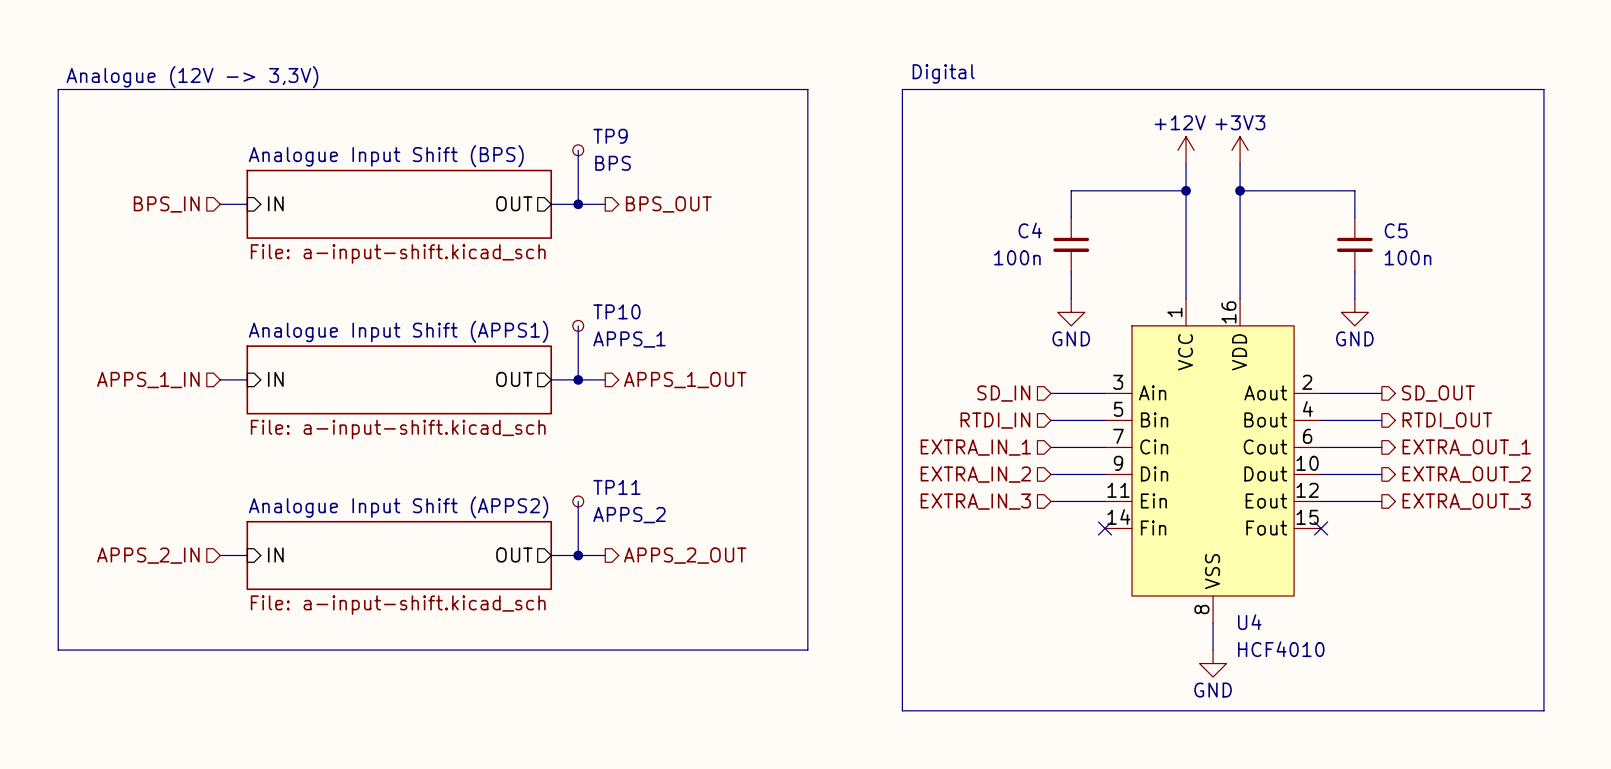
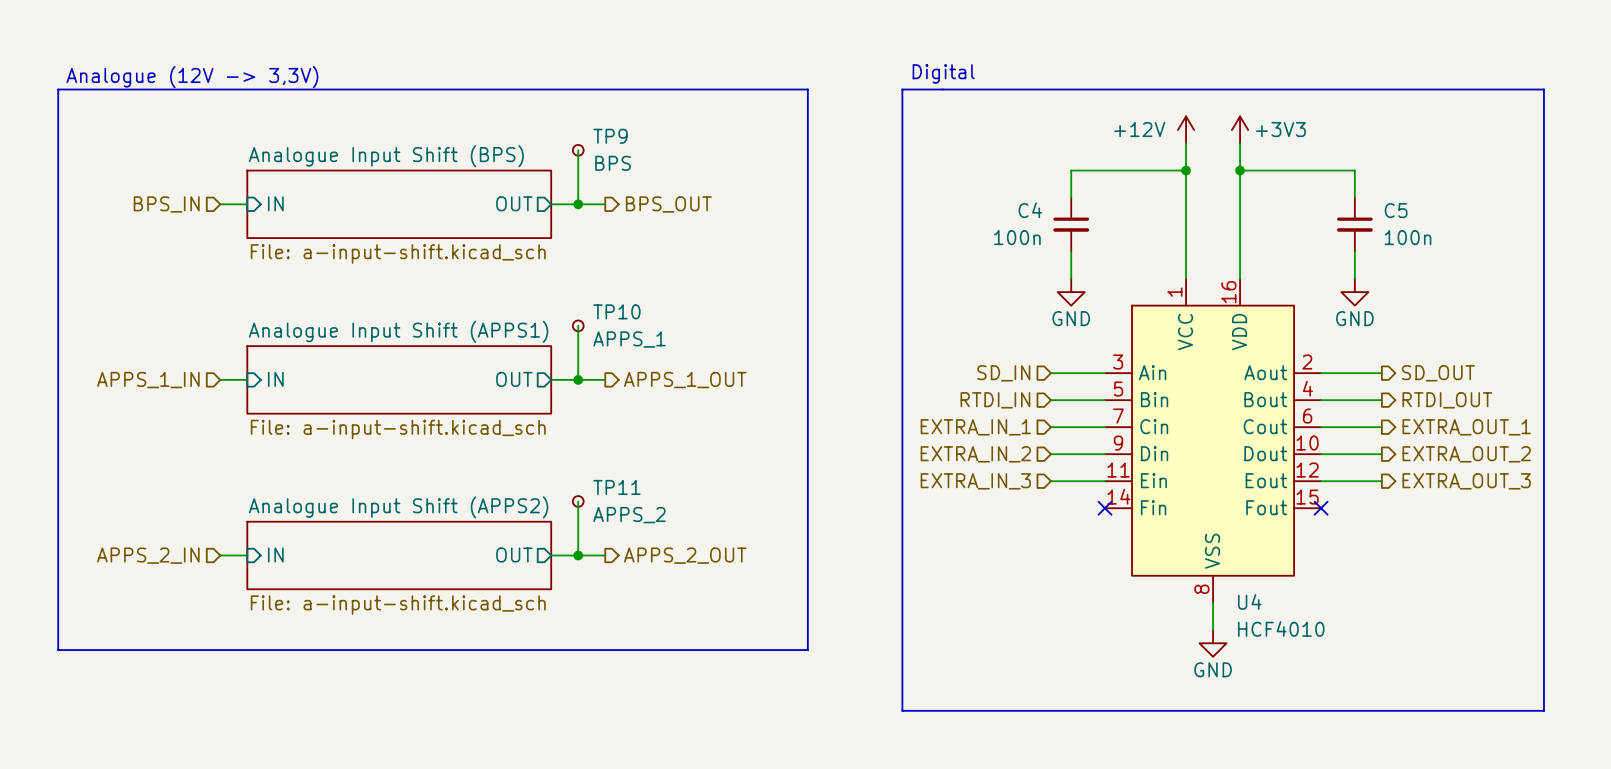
power symbol text position: +12V (1180, 122) -> +12V (1139, 129)
power symbol text position: +3V3 (1240, 122) -> +3V3 (1280, 129)
power symbol position: +12V (1186, 150) -> +12V (1186, 130)
power symbol position: +3V3 (1240, 150) -> +3V3 (1240, 130)
wire: (1071, 190) (1186, 190) -> (1071, 190) (1071, 170) (1186, 170)
junction position: (1186, 190) -> (1186, 170)
wire: (1240, 190) (1354, 190) -> (1240, 170) (1354, 170) (1354, 190)
junction position: (1240, 190) -> (1240, 170)
C4 position: (1071, 244) -> (1071, 224)
C5 position: (1354, 244) -> (1354, 224)
power symbol position: GND (1071, 312) -> GND (1071, 292)
power symbol position: GND (1354, 312) -> GND (1354, 292)
hierarchical label position: SD_IN (1003, 393) -> SD_IN (1003, 373)
wire: (1050, 393) (1104, 393) -> (1050, 373) (1104, 373)
wire: (1321, 393) (1381, 393) -> (1321, 373) (1381, 373)
hierarchical label position: SD_OUT (1438, 393) -> SD_OUT (1438, 373)
hierarchical label position: RTDI_IN (995, 420) -> RTDI_IN (995, 400)
wire: (1050, 420) (1104, 420) -> (1050, 400) (1104, 400)
wire: (1321, 420) (1381, 420) -> (1321, 400) (1381, 400)
hierarchical label position: RTDI_OUT (1447, 420) -> RTDI_OUT (1447, 400)
hierarchical label position: EXTRA_IN_1 (975, 447) -> EXTRA_IN_1 (975, 427)
wire: (1050, 447) (1104, 447) -> (1050, 427) (1104, 427)
wire: (1321, 447) (1381, 447) -> (1321, 427) (1381, 427)
hierarchical label position: EXTRA_OUT_1 (1466, 447) -> EXTRA_OUT_1 (1466, 427)
U4 position: (1213, 460) -> (1213, 440)
hierarchical label position: EXTRA_IN_2 (975, 474) -> EXTRA_IN_2 (975, 454)
wire: (1050, 474) (1104, 474) -> (1050, 454) (1104, 454)
wire: (1321, 474) (1381, 474) -> (1321, 454) (1381, 454)
hierarchical label position: EXTRA_OUT_2 (1466, 474) -> EXTRA_OUT_2 (1466, 454)
hierarchical label position: EXTRA_IN_3 (975, 501) -> EXTRA_IN_3 (975, 481)
wire: (1050, 501) (1104, 501) -> (1050, 481) (1104, 481)
wire: (1321, 501) (1381, 501) -> (1321, 481) (1381, 481)
hierarchical label position: EXTRA_OUT_3 (1466, 501) -> EXTRA_OUT_3 (1466, 481)
no-connect mark position: (1104, 528) -> (1104, 508)
no-connect mark position: (1321, 528) -> (1321, 508)
power symbol position: GND (1213, 663) -> GND (1213, 643)

